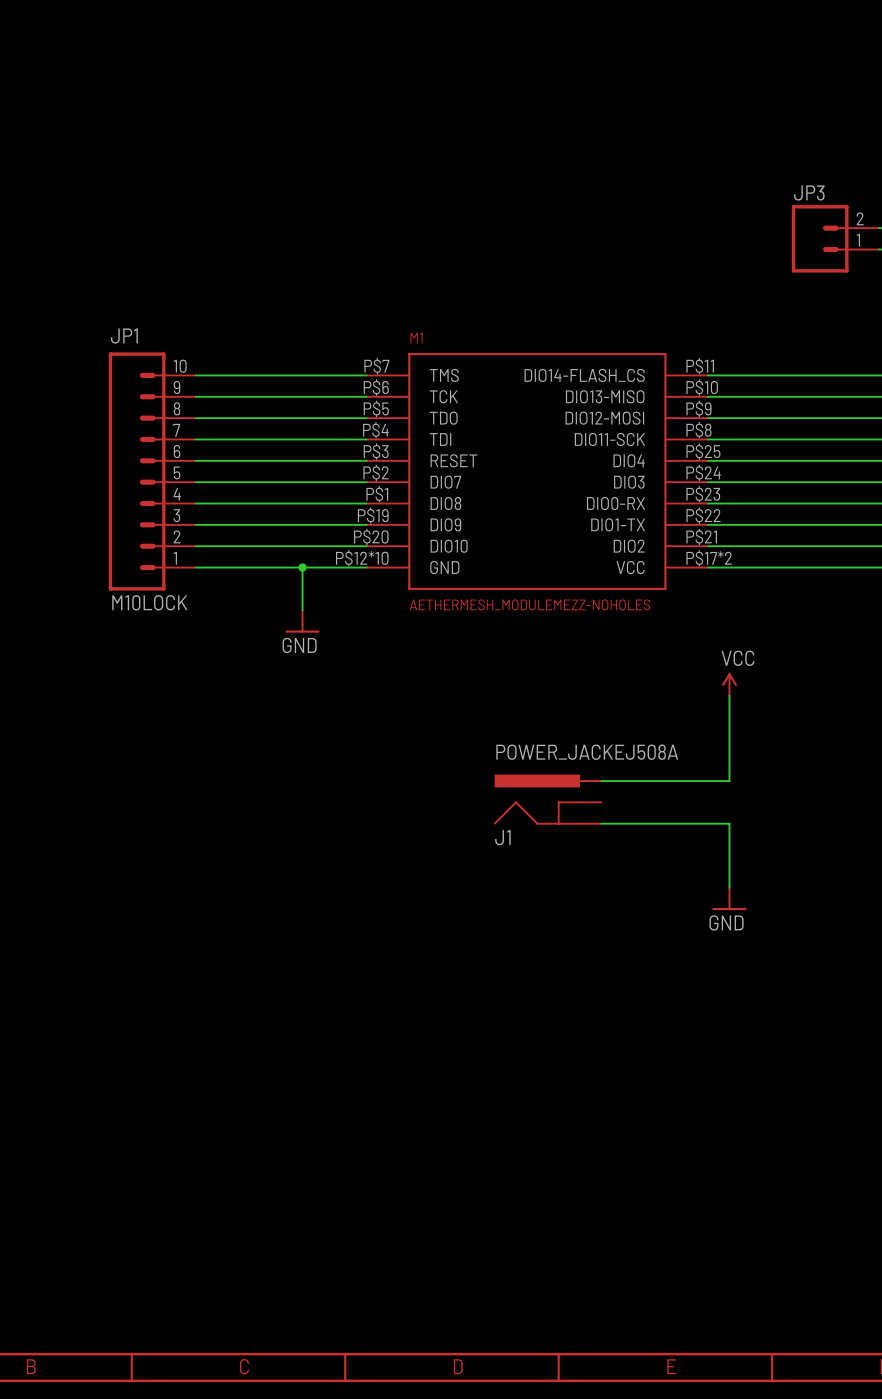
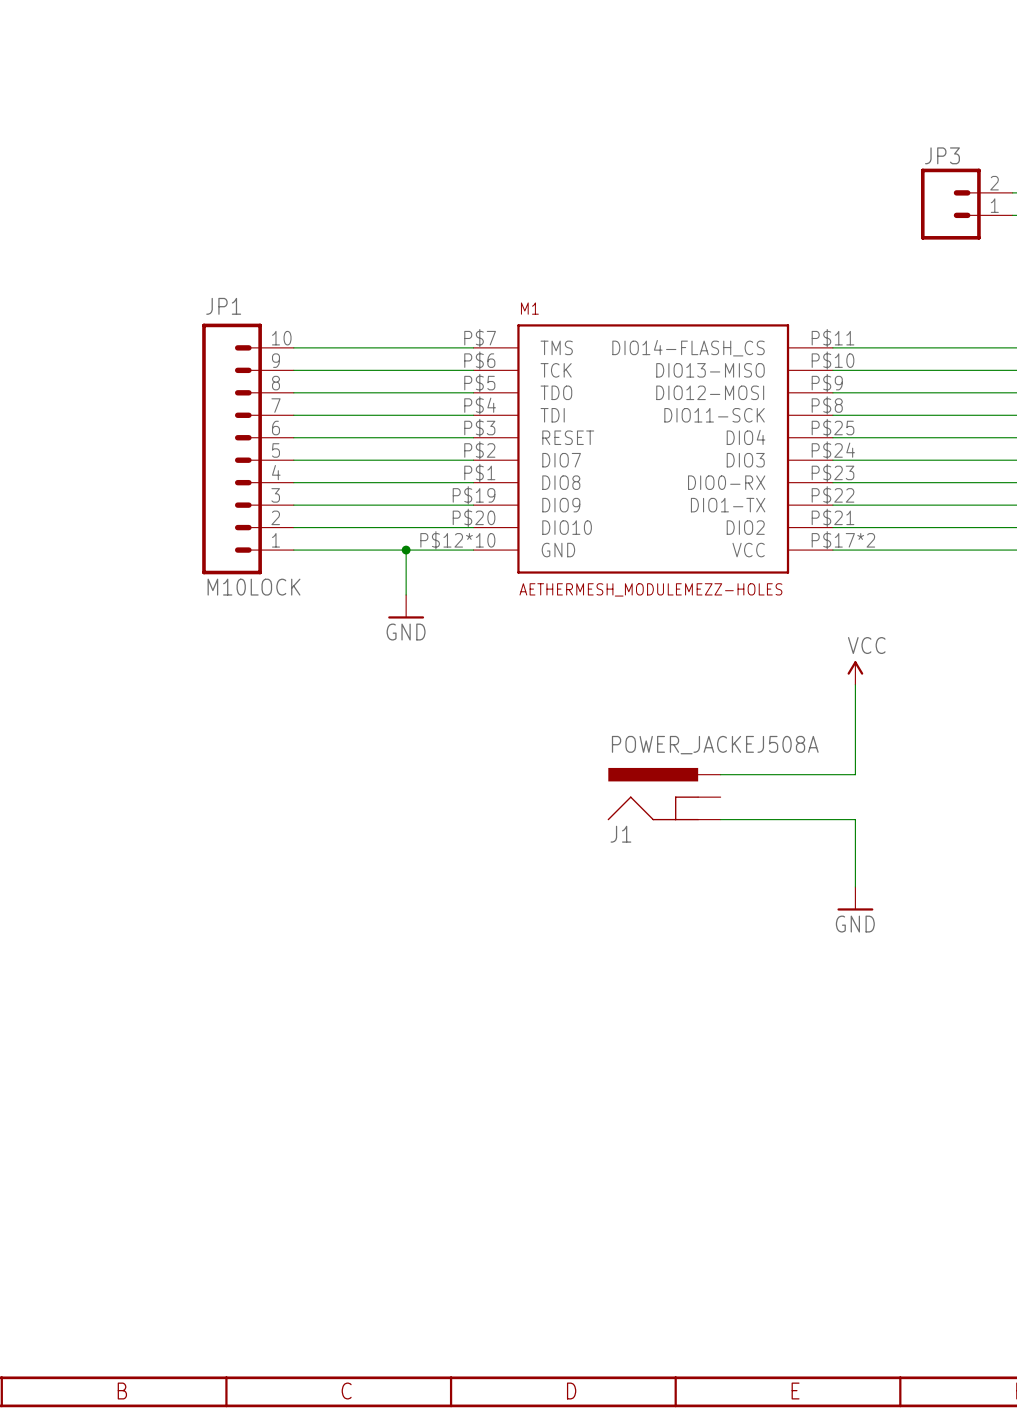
M1 value: AETHERMESH_MODULEMEZZ-NOHOLES (529, 604) -> AETHERMESH_MODULEMEZZ-HOLES (650, 589)

